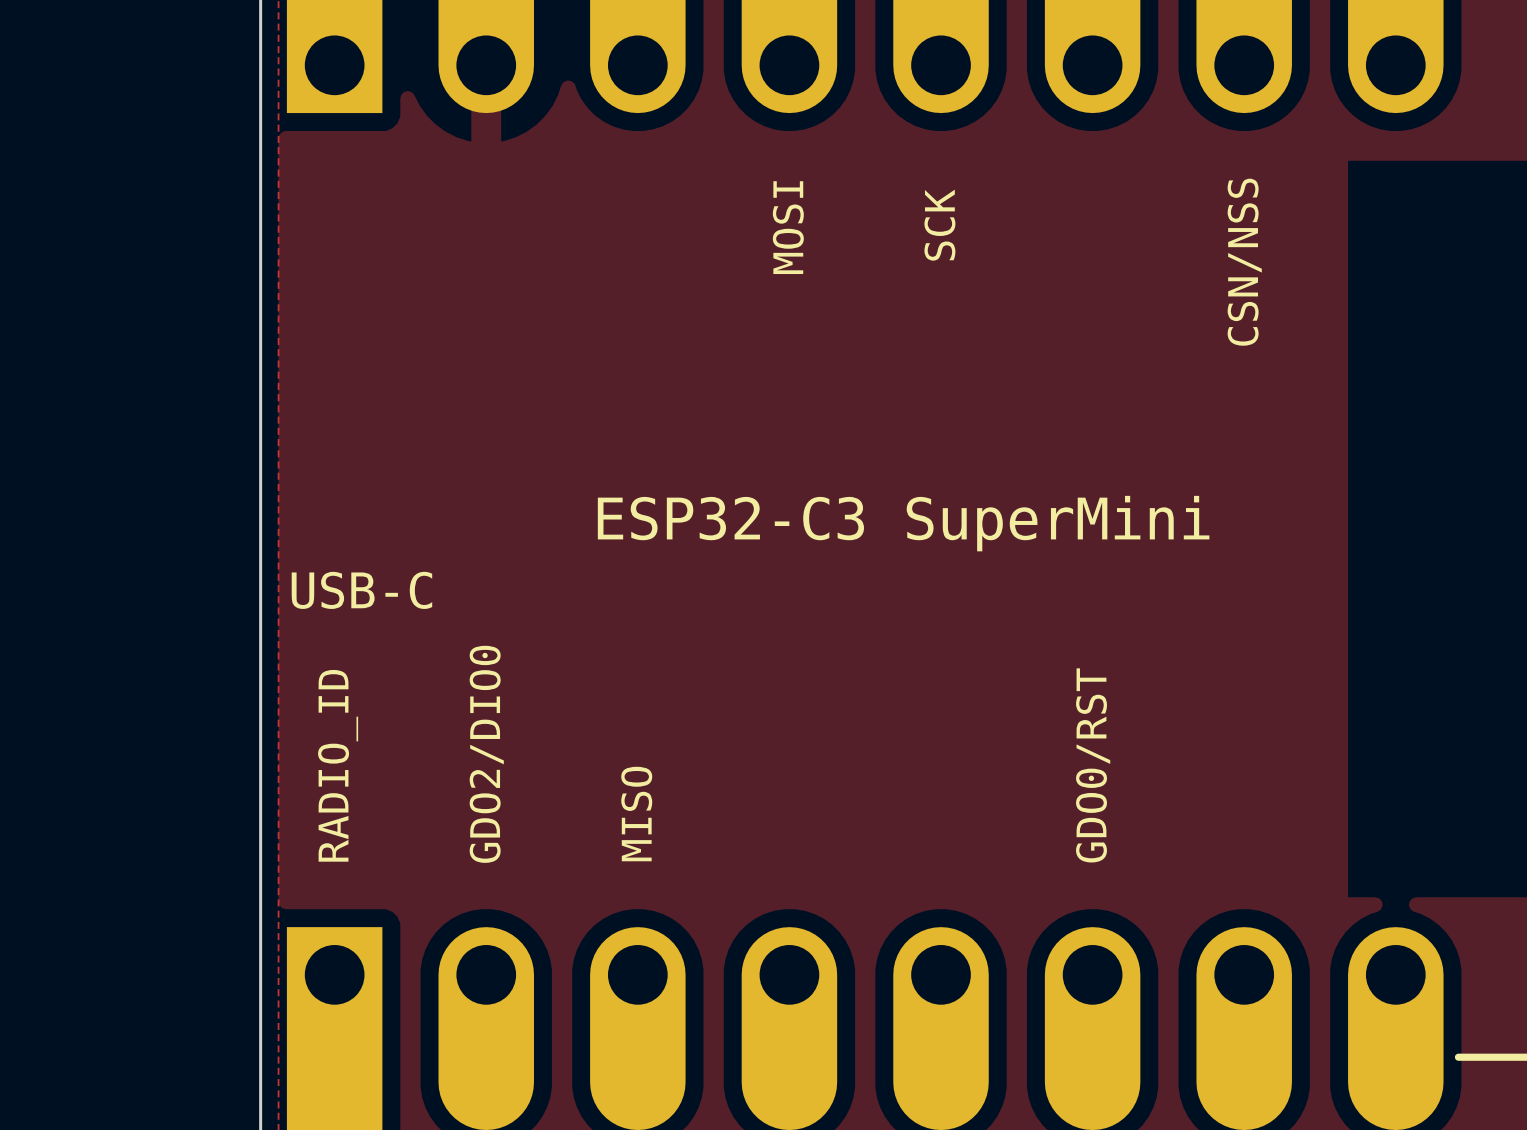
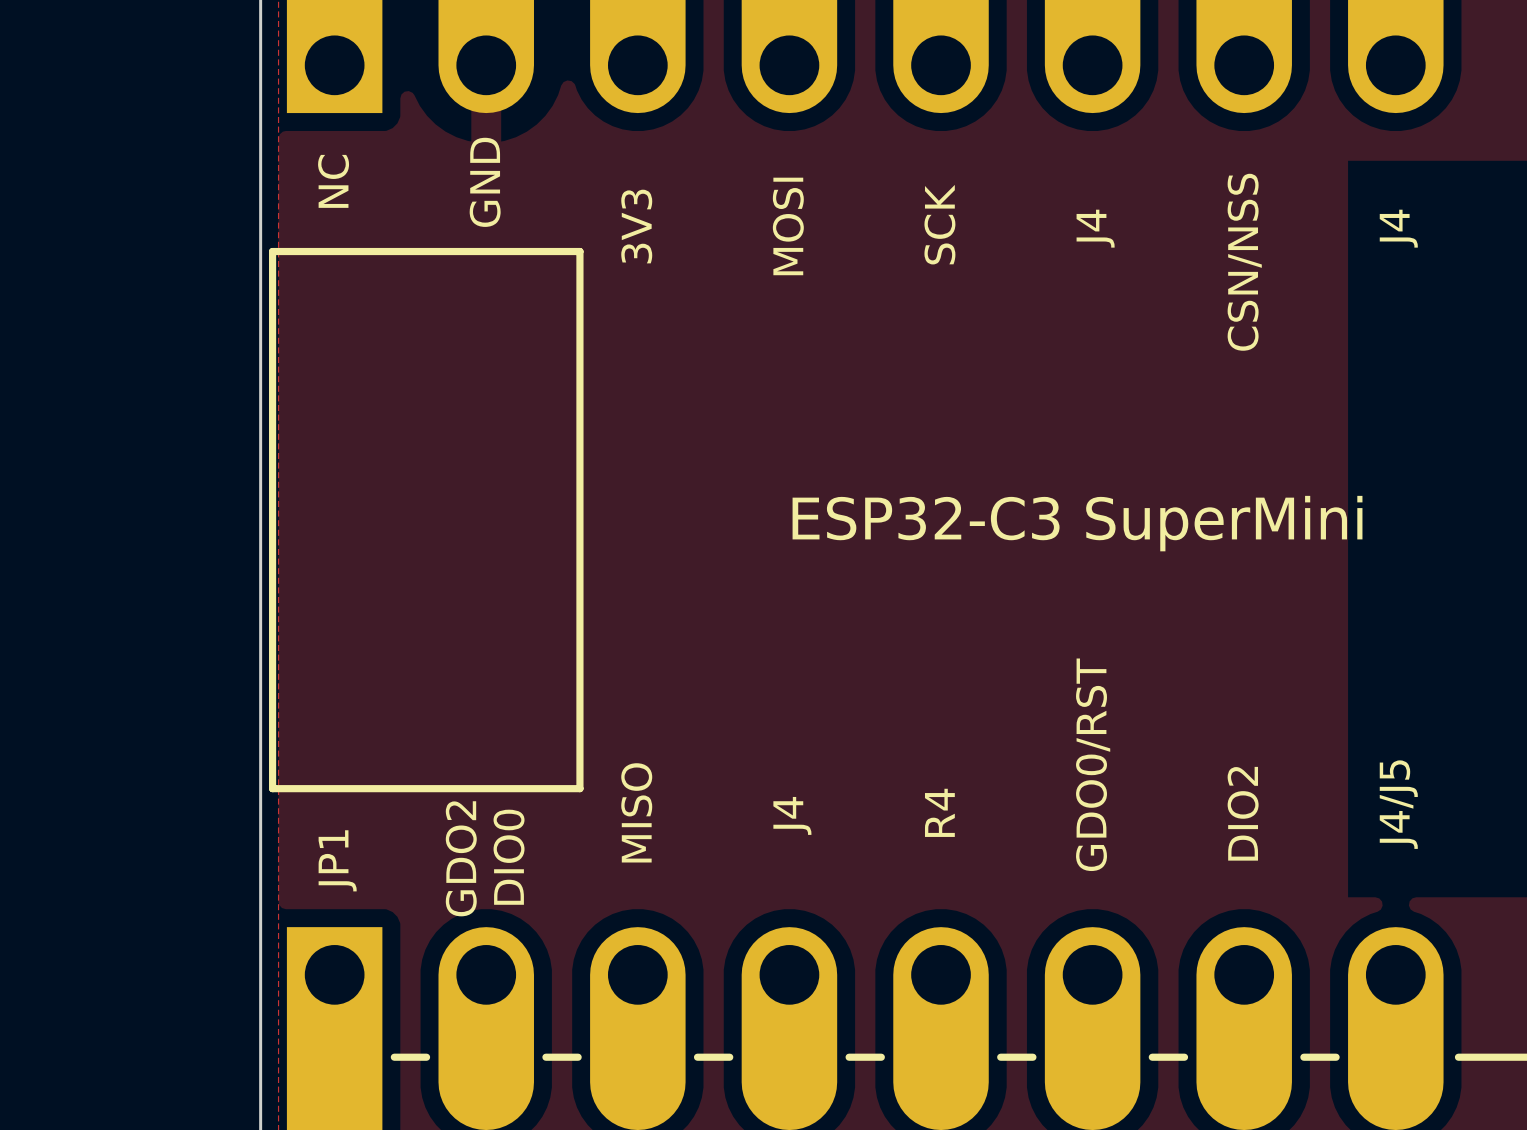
text: none -> NC (333, 181)
text: none -> GND (485, 182)
text: none -> 3V3 (636, 226)
text: none -> J4 (1095, 228)
text: none -> J4 (1398, 228)
line: none -> (272, 251) (579, 251) (579, 788) (272, 788) (272, 251)
text position: ESP32-C3 SuperMini (903, 523) -> ESP32-C3 SuperMini (1077, 523)
text: USB-C (361, 590) -> none
text: GDO2/DIO0 (486, 754) -> none
text: RADIO_ID (338, 765) -> none
text: none -> J4/J5 (1398, 804)
text: none -> J4 (792, 815)
text: none -> R4 (939, 812)
text: none -> DIO2 (1243, 813)
text: none -> DIO0 (509, 857)
text: none -> JP1 (337, 860)
text: none -> GDO2 (461, 858)
line: none -> (394, 1057) (426, 1057)
line: none -> (545, 1057) (578, 1057)
line: none -> (697, 1057) (729, 1057)
line: none -> (849, 1057) (881, 1057)
line: none -> (1000, 1057) (1032, 1057)
line: none -> (1152, 1057) (1184, 1057)
line: none -> (1303, 1057) (1336, 1057)

